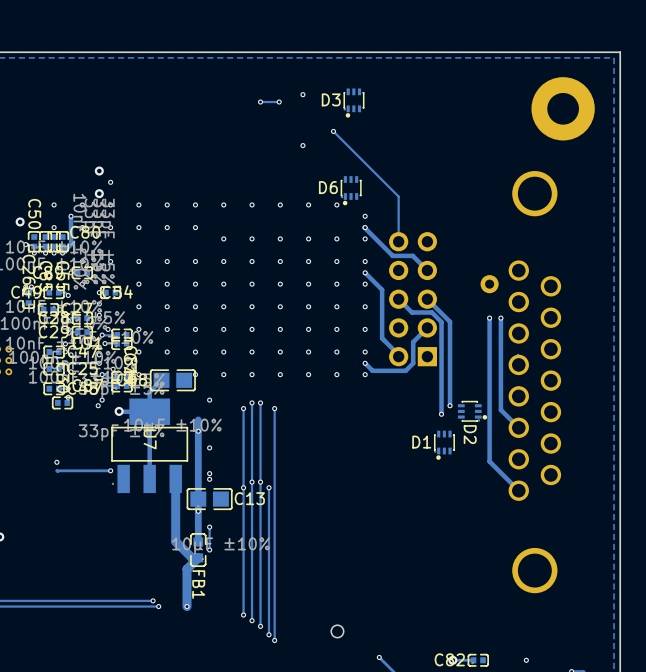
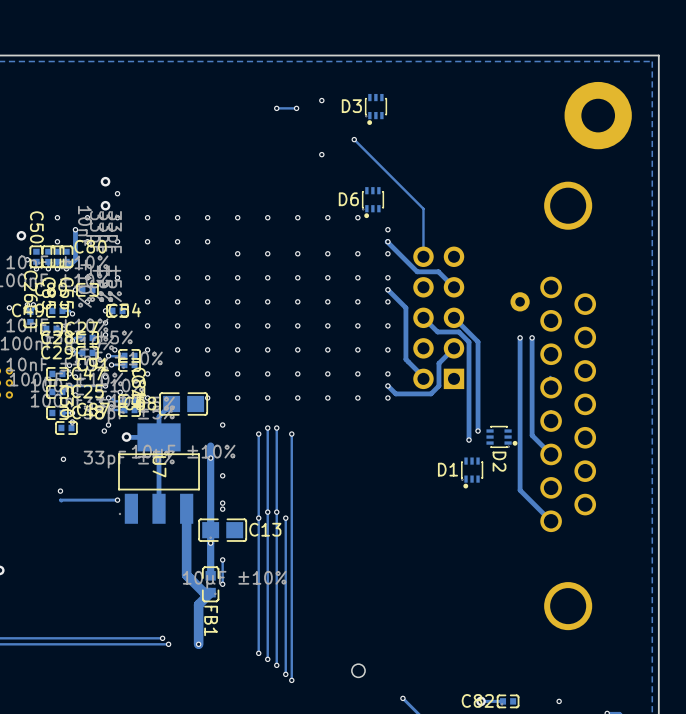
via: none -> (9, 307)
via: none -> (63, 459)

